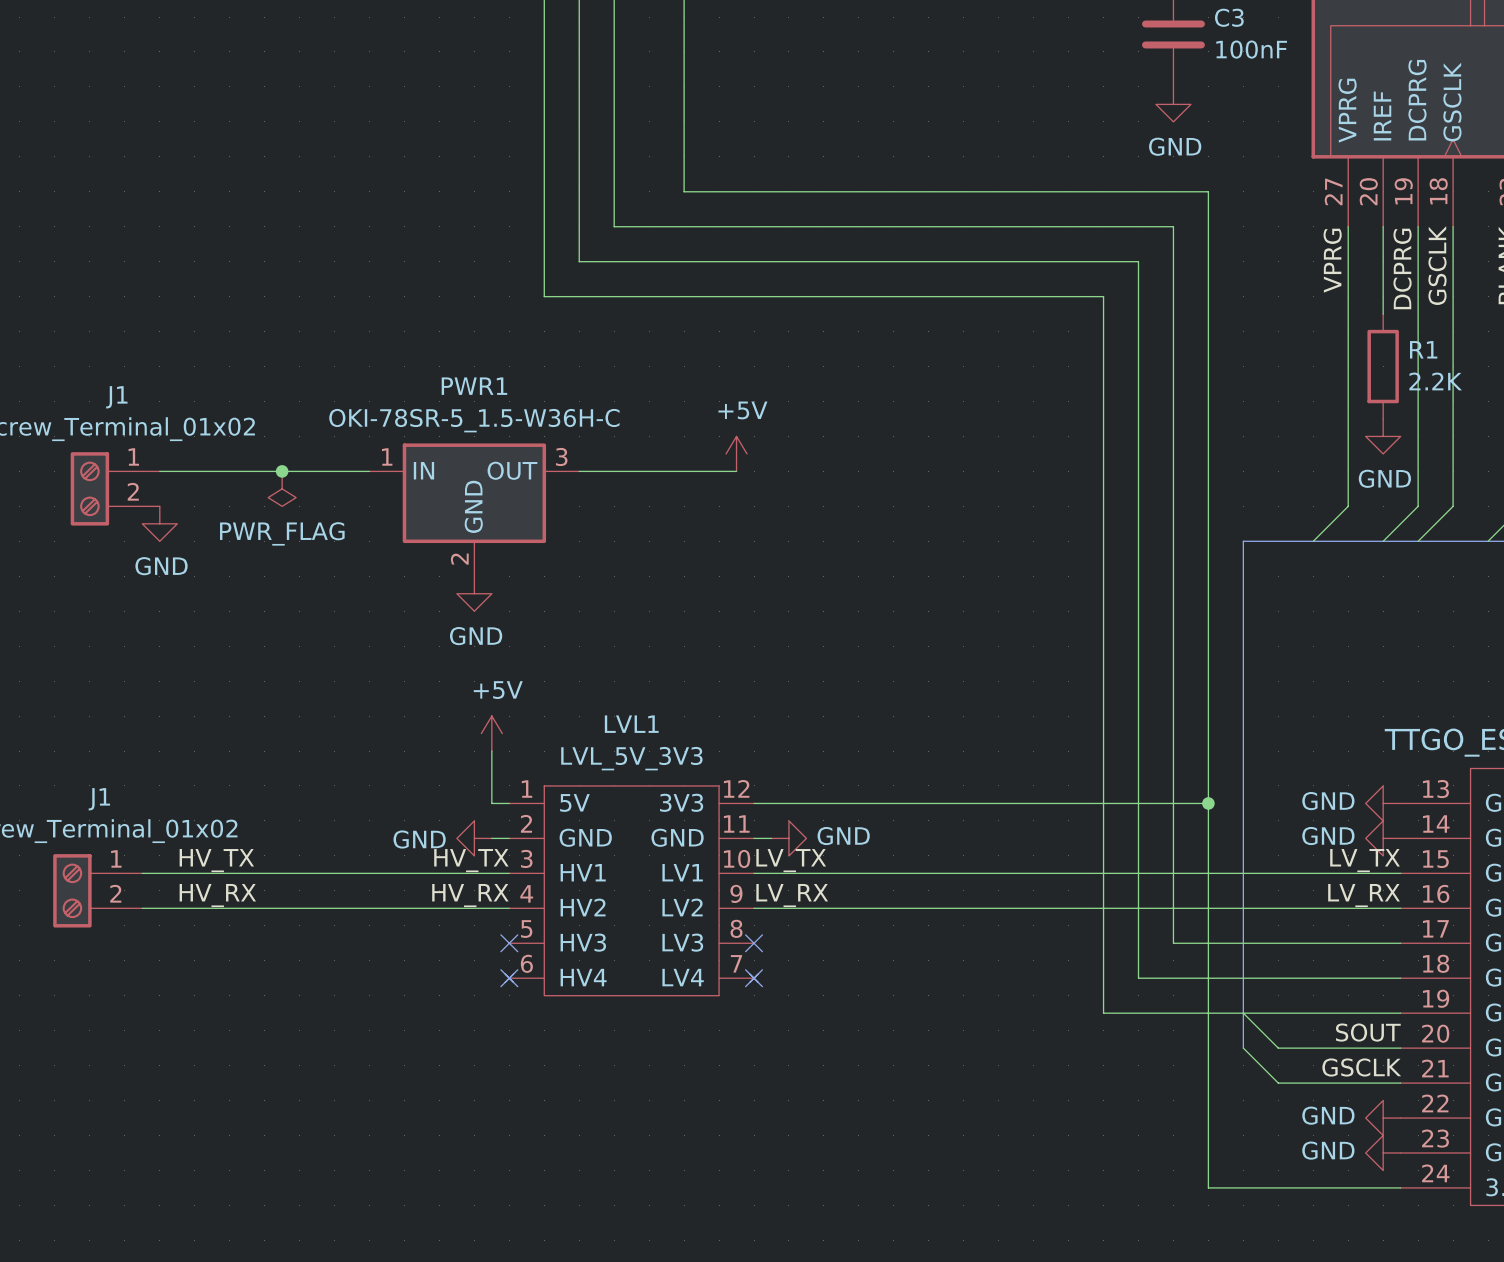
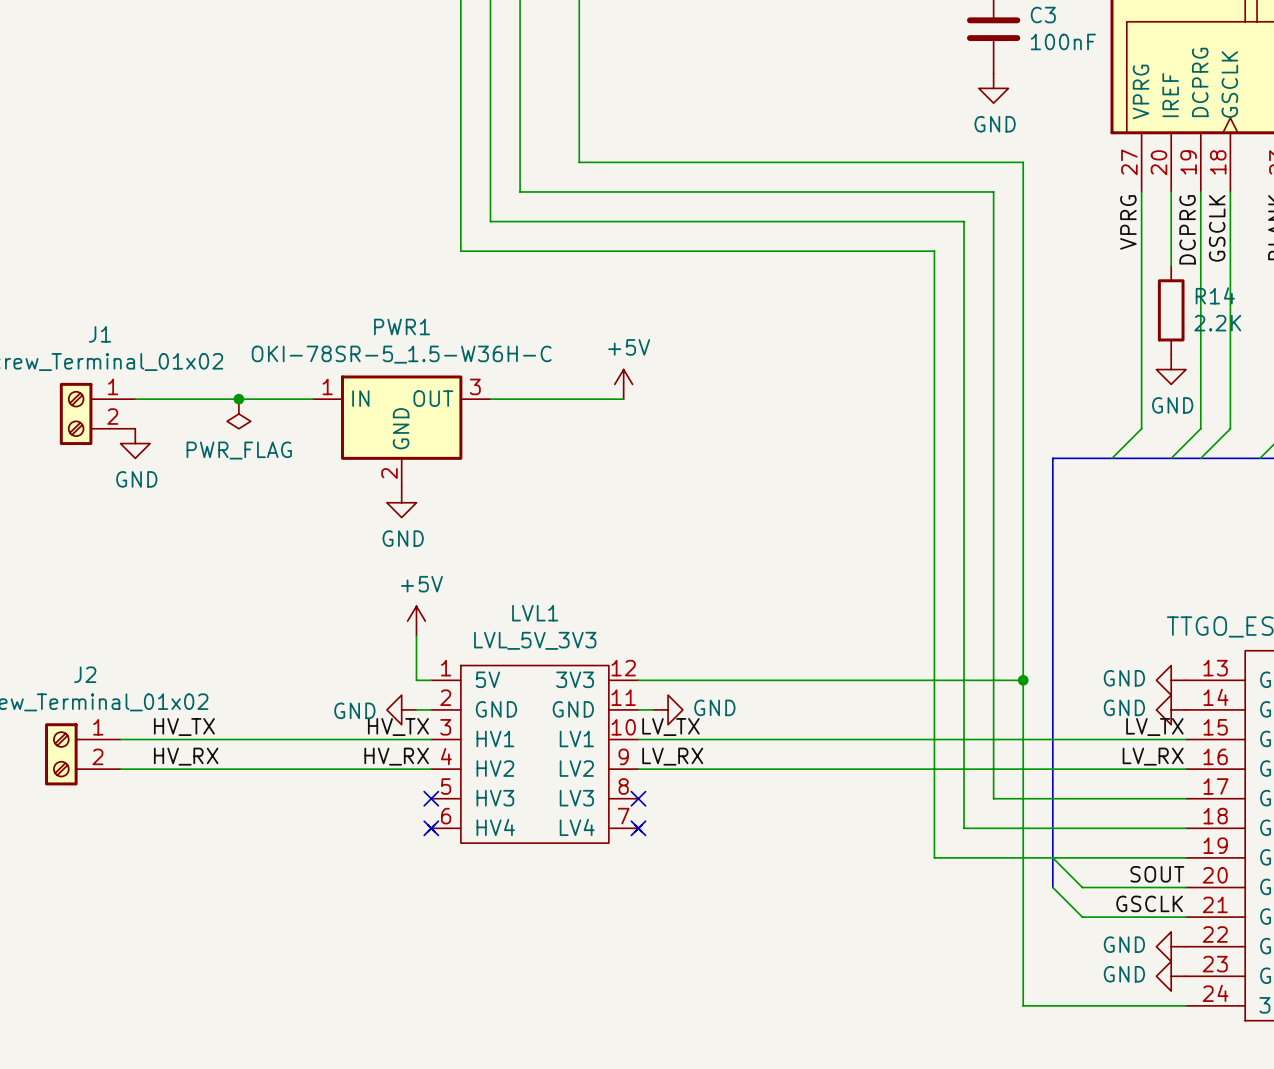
R1 name: R1 (1423, 349) -> R14 (1215, 295)
J1 name: J1 (99, 799) -> J2 (85, 674)

